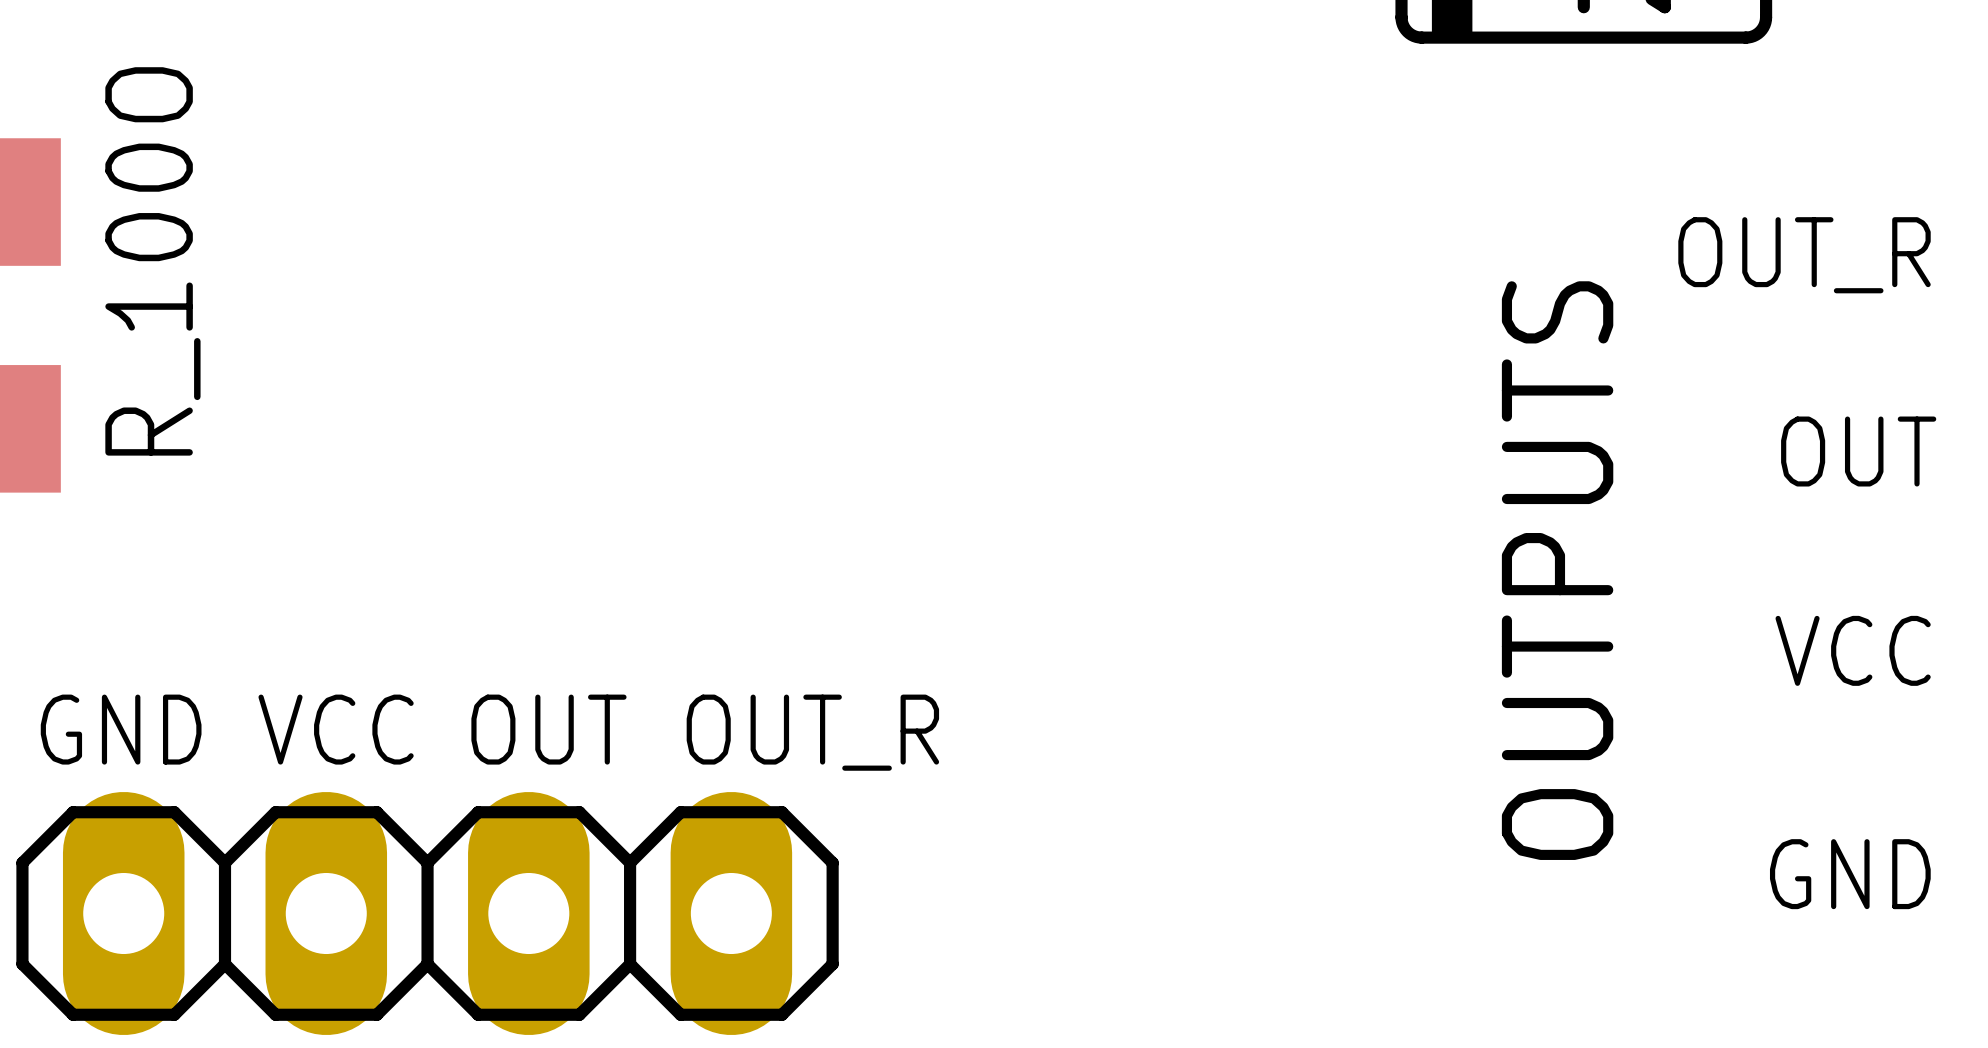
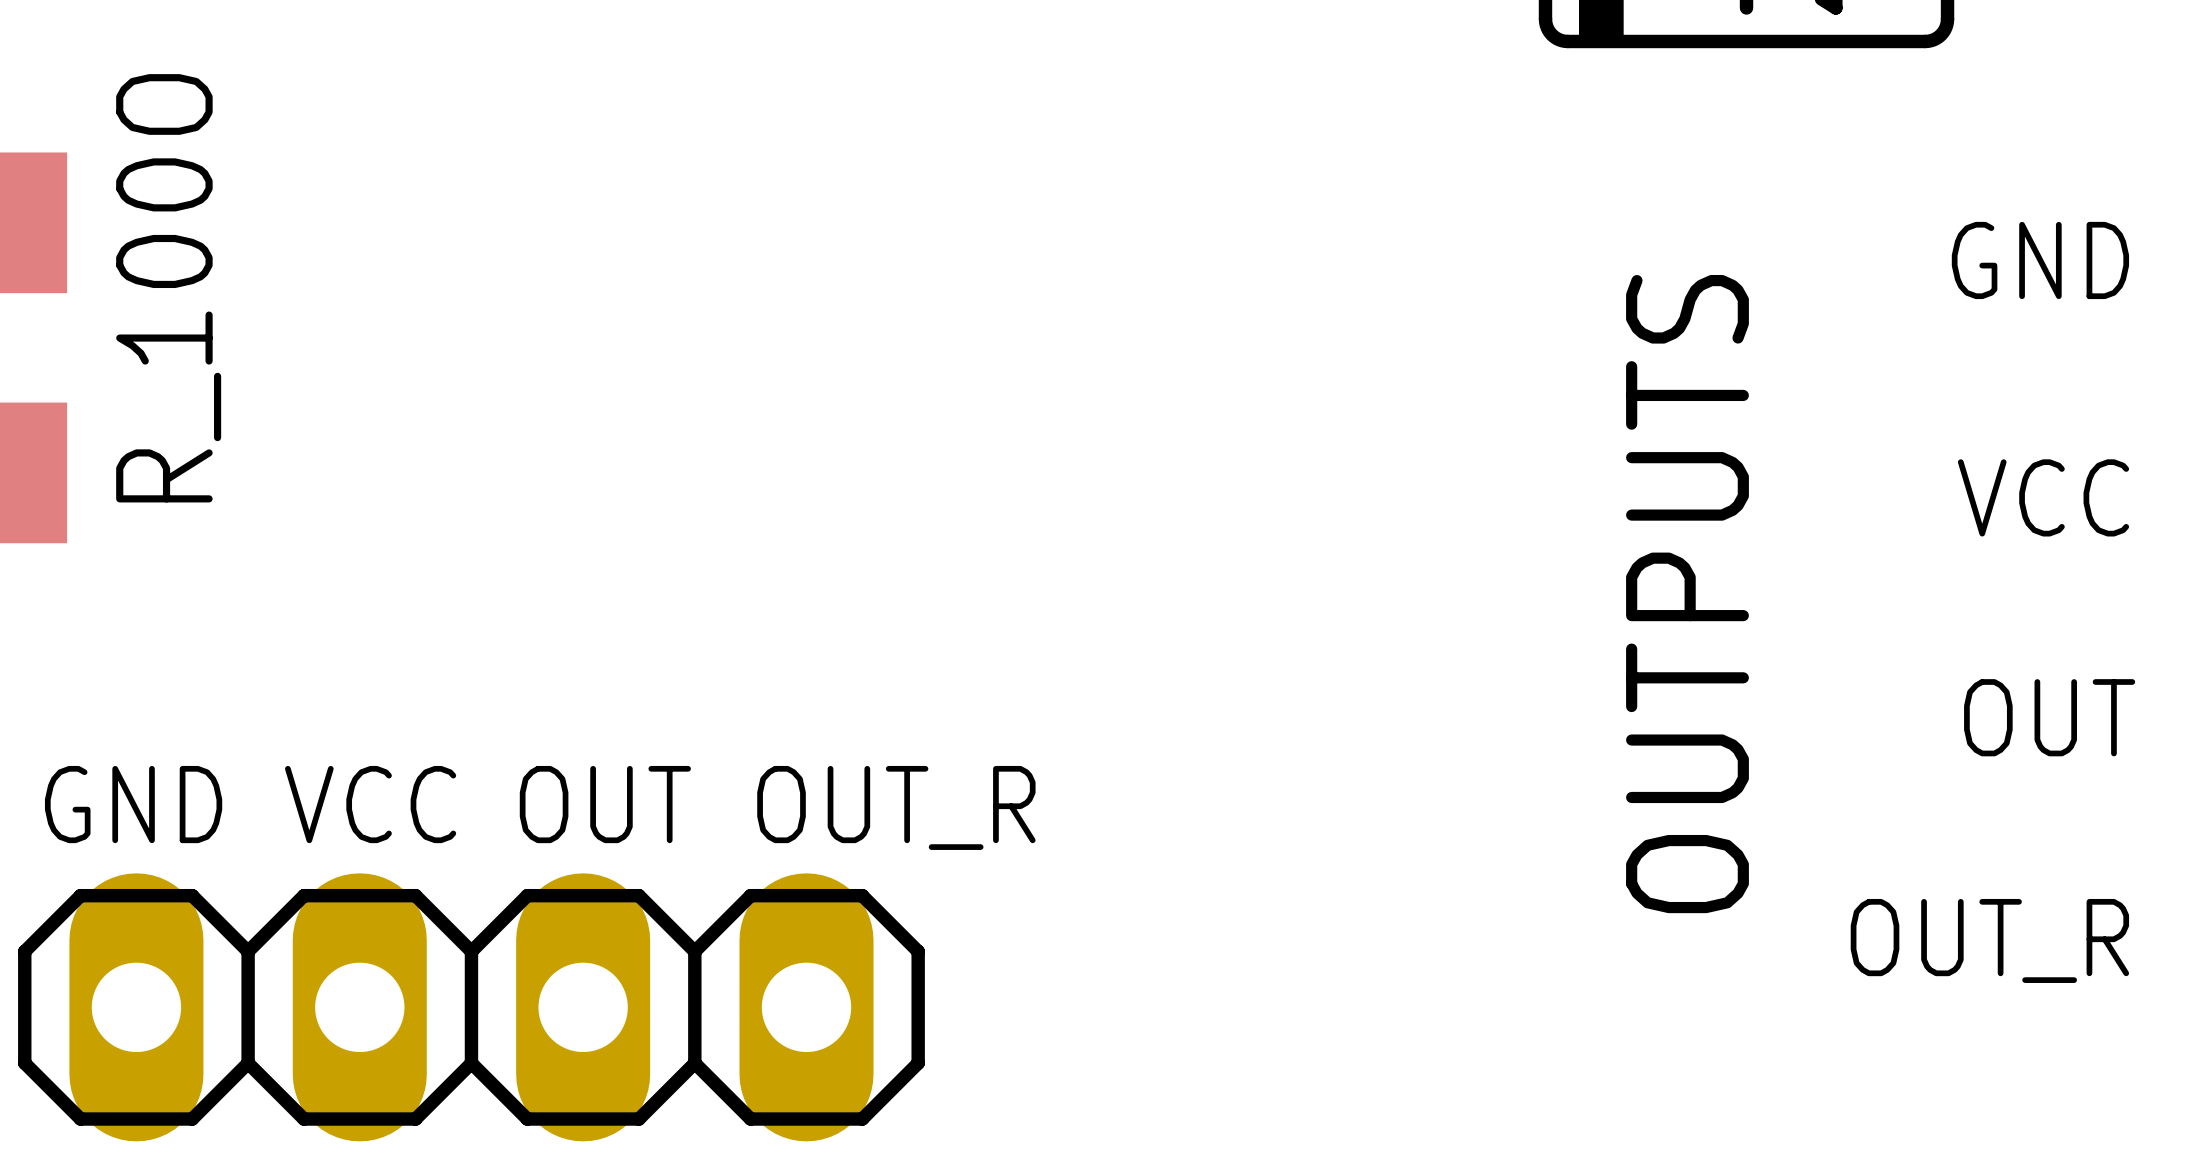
text position: OUT_R (1804, 255) -> OUT_R (1989, 940)
text: OUT (1858, 451) -> VCC (2043, 497)
OUTPUTS name position: OUTPUTS (1557, 570) -> OUTPUTS (1687, 594)
text: VCC (1853, 650) -> OUT (2049, 717)
text position: GND (1850, 874) -> GND (2040, 260)

